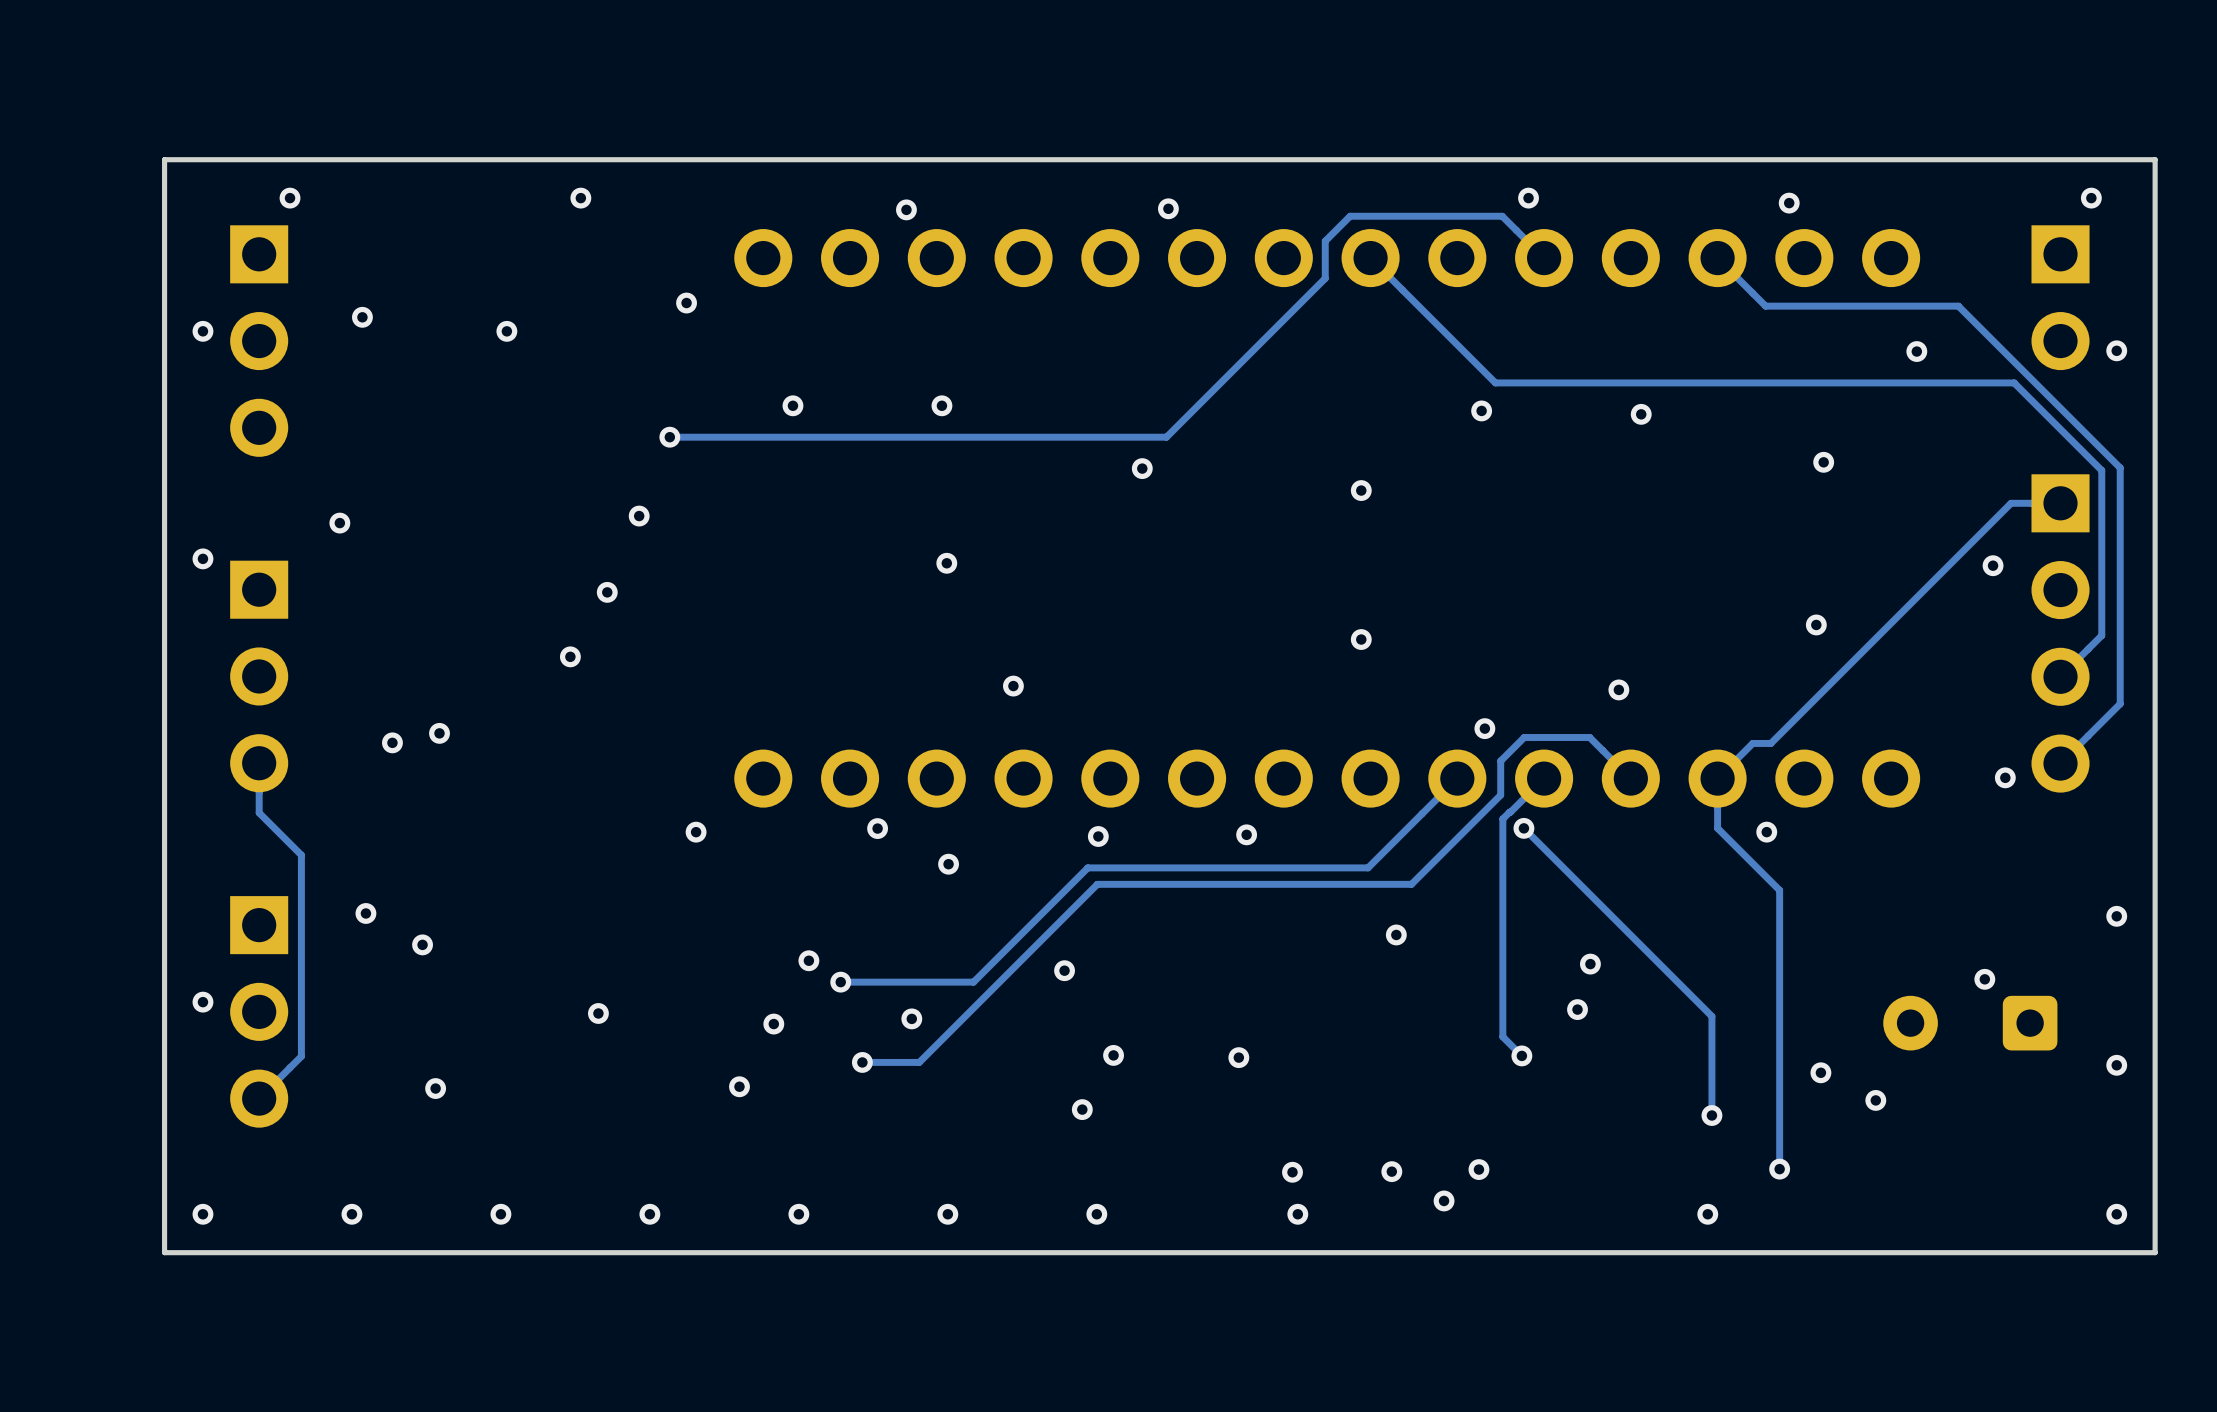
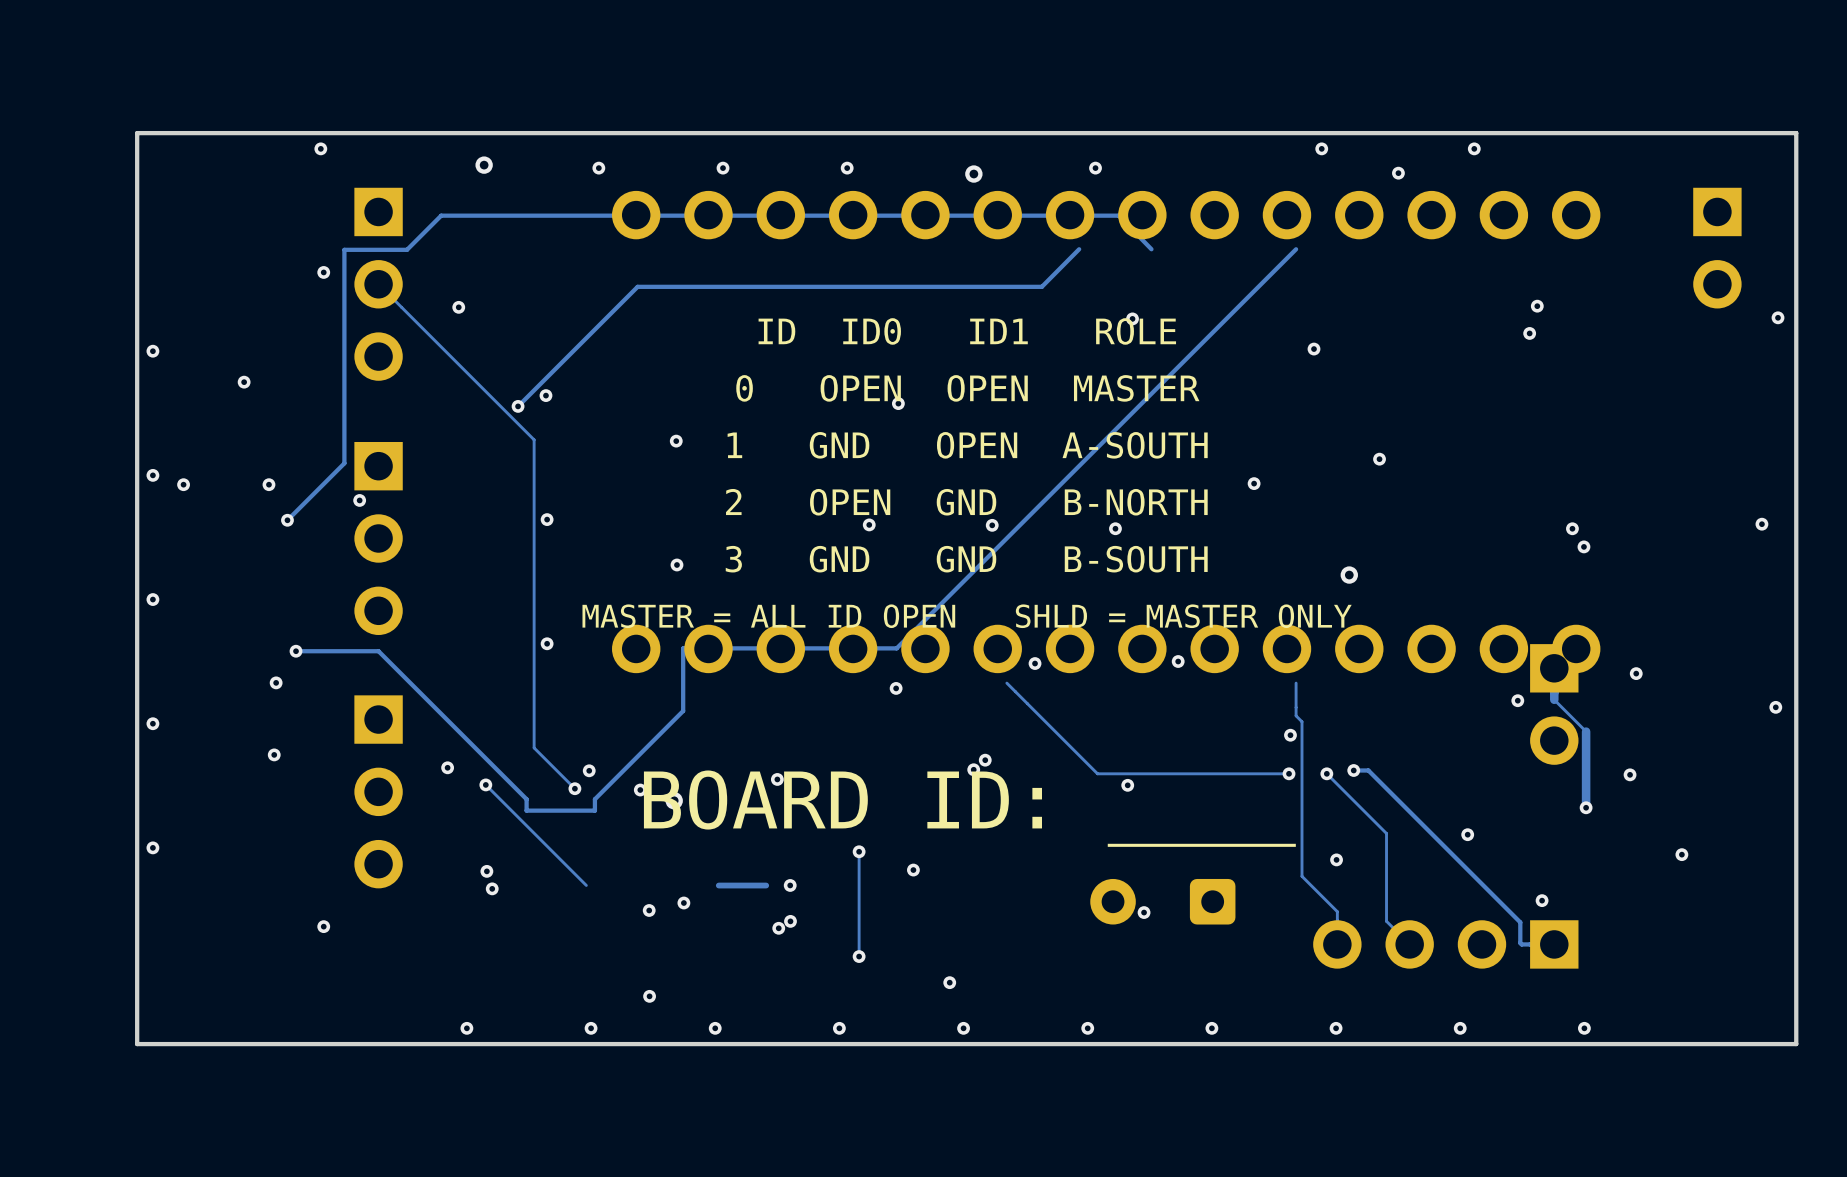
via: none -> (320, 148)
via: none -> (1321, 148)
via: none -> (1474, 148)
via: (290, 198) -> none
via: (1528, 198) -> none
via: (2091, 198) -> none
via: none -> (598, 168)
via: none -> (723, 168)
via: none -> (847, 168)
via: none -> (1095, 168)
via: (1789, 203) -> none
via: none -> (1398, 173)
via: (906, 209) -> none
track: (1370, 258) (1495, 382) (2014, 382) (2101, 470) (2101, 635) (2060, 676) -> none
track: (1544, 258) (1502, 216) (1350, 216) (1325, 241) (1325, 278) (1166, 437) (669, 437) -> none
track: (1717, 258) (1765, 306) (1958, 306) (2120, 467) (2120, 703) (2060, 763) -> none
track: none -> (1079, 249) (1041, 286) (637, 286) (518, 406)
track: none -> (1151, 249) (1118, 215) (441, 215) (407, 249) (344, 249) (344, 463) (287, 520)
track: none -> (1296, 249) (896, 648) (683, 648) (683, 711) (594, 799) (594, 810) (526, 810) (526, 799) (378, 651) (296, 651)
via: (686, 303) -> none
via: (362, 317) -> none
via: none -> (323, 272)
via: (202, 331) -> none
via: (506, 331) -> none
part: (259, 341) -> none
track: none -> (378, 284) (534, 439) (534, 747) (574, 788)
part: none -> (378, 284)
via: (2116, 350) -> none
via: (1916, 351) -> none
via: none -> (1537, 306)
via: none -> (458, 307)
via: none -> (1778, 317)
via: none -> (1132, 318)
text: none -> ID ID0 ID1 ROLE (967, 331)
via: none -> (1529, 333)
via: (792, 405) -> none
via: (941, 405) -> none
via: (1481, 410) -> none
via: (1641, 414) -> none
via: none -> (1313, 349)
via: none -> (152, 351)
via: (669, 437) -> none
via: none -> (244, 382)
via: (1823, 462) -> none
text: none -> 0 OPEN OPEN MASTER (967, 388)
via: (1142, 468) -> none
via: none -> (545, 395)
via: none -> (898, 403)
via: none -> (518, 406)
via: (1361, 490) -> none
track: (2060, 503) (2011, 503) (1770, 743) (1752, 743) (1717, 778) (1717, 828) (1779, 890) (1779, 1169) -> none
via: (639, 516) -> none
via: (339, 523) -> none
via: none -> (676, 441)
text: none -> 1 GND OPEN A-SOUTH (967, 445)
via: none -> (1379, 459)
via: (202, 558) -> none
via: (946, 563) -> none
via: (1993, 565) -> none
via: none -> (152, 475)
via: none -> (1254, 483)
via: none -> (183, 484)
via: none -> (268, 484)
via: (607, 592) -> none
via: none -> (359, 500)
text: none -> 2 OPEN GND B-NORTH (966, 502)
via: none -> (547, 519)
via: none -> (287, 520)
via: (1816, 624) -> none
via: none -> (1761, 524)
via: none -> (869, 524)
via: none -> (992, 525)
part rotation: 0° (2060, 633) -> 90° clockwise (1445, 944)
part position: (2060, 633) -> (1445, 944)
via: none -> (1115, 528)
via: none -> (1572, 528)
via: (1361, 639) -> none
part: none -> (378, 538)
via: (570, 656) -> none
via: none -> (1583, 546)
text: none -> 3 GND GND B-SOUTH (966, 559)
part: (259, 676) -> none
via: none -> (676, 564)
via: (1013, 686) -> none
via: none -> (152, 599)
via: (1484, 728) -> none
via: (439, 733) -> none
text: none -> MASTER = ALL ID OPEN SHLD = MASTER ONLY (967, 616)
via: (392, 742) -> none
track: (259, 763) (259, 812) (301, 855) (301, 1056) (259, 1098) -> none
via: none -> (547, 643)
via: (2005, 777) -> none
track: (1457, 778) (1368, 867) (1087, 867) (973, 982) (840, 982) -> none
track: (1544, 778) (1502, 818) (1502, 1036) (1521, 1055) -> none
track: (1630, 778) (1589, 737) (1524, 737) (1500, 761) (1500, 795) (1411, 884) (1097, 884) (919, 1062) -> none
via: none -> (296, 651)
via: none -> (1178, 661)
via: none -> (1035, 663)
track: none -> (1554, 668) (1554, 699) (1586, 731) (1586, 807)
via: none -> (1636, 673)
via: none -> (276, 682)
track: none -> (1006, 683) (1097, 773) (1289, 773)
track: none -> (1296, 683) (1296, 715) (1302, 721) (1302, 876) (1337, 911) (1337, 944)
via: none -> (896, 688)
via: (877, 828) -> none
track: (1523, 828) (1711, 1016) (1711, 1115) -> none
via: (1523, 828) -> none
via: (696, 832) -> none
via: (1766, 832) -> none
via: (1246, 834) -> none
via: (1098, 836) -> none
via: none -> (1517, 700)
part: none -> (1554, 704)
via: none -> (1775, 707)
via: (948, 864) -> none
via: none -> (152, 723)
via: none -> (1290, 735)
via: none -> (274, 754)
via: none -> (985, 760)
via: (365, 913) -> none
via: (2116, 916) -> none
via: none -> (447, 767)
via: none -> (973, 769)
via: none -> (589, 770)
track: none -> (1353, 770) (1368, 770) (1520, 922) (1521, 944) (1554, 944)
via: none -> (1353, 770)
via: none -> (1289, 773)
track: none -> (1326, 773) (1386, 833) (1386, 921) (1409, 944)
via: none -> (1326, 773)
via: none -> (1630, 774)
via: (1396, 934) -> none
via: none -> (777, 779)
track: none -> (485, 784) (586, 885)
via: none -> (485, 784)
via: none -> (1127, 785)
via: (422, 944) -> none
via: none -> (574, 788)
via: none -> (640, 790)
part: none -> (378, 791)
via: (1590, 964) -> none
via: none -> (1586, 807)
via: (1064, 970) -> none
text: none -> BOARD ID: ____ (969, 808)
via: (1984, 979) -> none
via: (840, 982) -> none
via: none -> (1467, 834)
via: (202, 1002) -> none
via: (1577, 1009) -> none
part: (259, 1011) -> none
via: (598, 1013) -> none
via: none -> (152, 847)
via: (911, 1018) -> none
track: none -> (859, 851) (859, 956)
via: none -> (859, 851)
part position: (1970, 1023) -> (1162, 901)
via: (773, 1024) -> none
via: none -> (1681, 854)
via: none -> (1336, 859)
via: none -> (486, 871)
via position: (1113, 1055) -> (913, 870)
via: (1521, 1055) -> none
via: (1238, 1057) -> none
via: (862, 1062) -> none
via: none -> (790, 885)
via: (2116, 1065) -> none
via: none -> (492, 888)
via: (1820, 1072) -> none
via: none -> (1542, 900)
via: none -> (683, 903)
via: (739, 1086) -> none
via: (435, 1088) -> none
via: none -> (649, 910)
via: none -> (1144, 912)
via: (1875, 1100) -> none
via: none -> (790, 921)
via: (1082, 1109) -> none
via: none -> (323, 926)
via: none -> (778, 928)
via: (1711, 1115) -> none
via: none -> (859, 956)
via: (1478, 1169) -> none
via: (1779, 1169) -> none
via: (1391, 1171) -> none
via: (1292, 1172) -> none
via: none -> (949, 982)
via: none -> (649, 996)
via: (1444, 1200) -> none
via: (202, 1214) -> none
via: (351, 1214) -> none
via: (500, 1214) -> none
via: (649, 1214) -> none
via: (798, 1214) -> none
via: (947, 1214) -> none
via: (1096, 1214) -> none
via: (1297, 1214) -> none
via: (1707, 1214) -> none
via: (2116, 1214) -> none
via: none -> (466, 1028)
via: none -> (591, 1028)
via: none -> (715, 1028)
via: none -> (839, 1028)
via: none -> (963, 1028)
via: none -> (1087, 1028)
via: none -> (1211, 1028)
via: none -> (1336, 1028)
via: none -> (1460, 1028)
via: none -> (1584, 1028)

